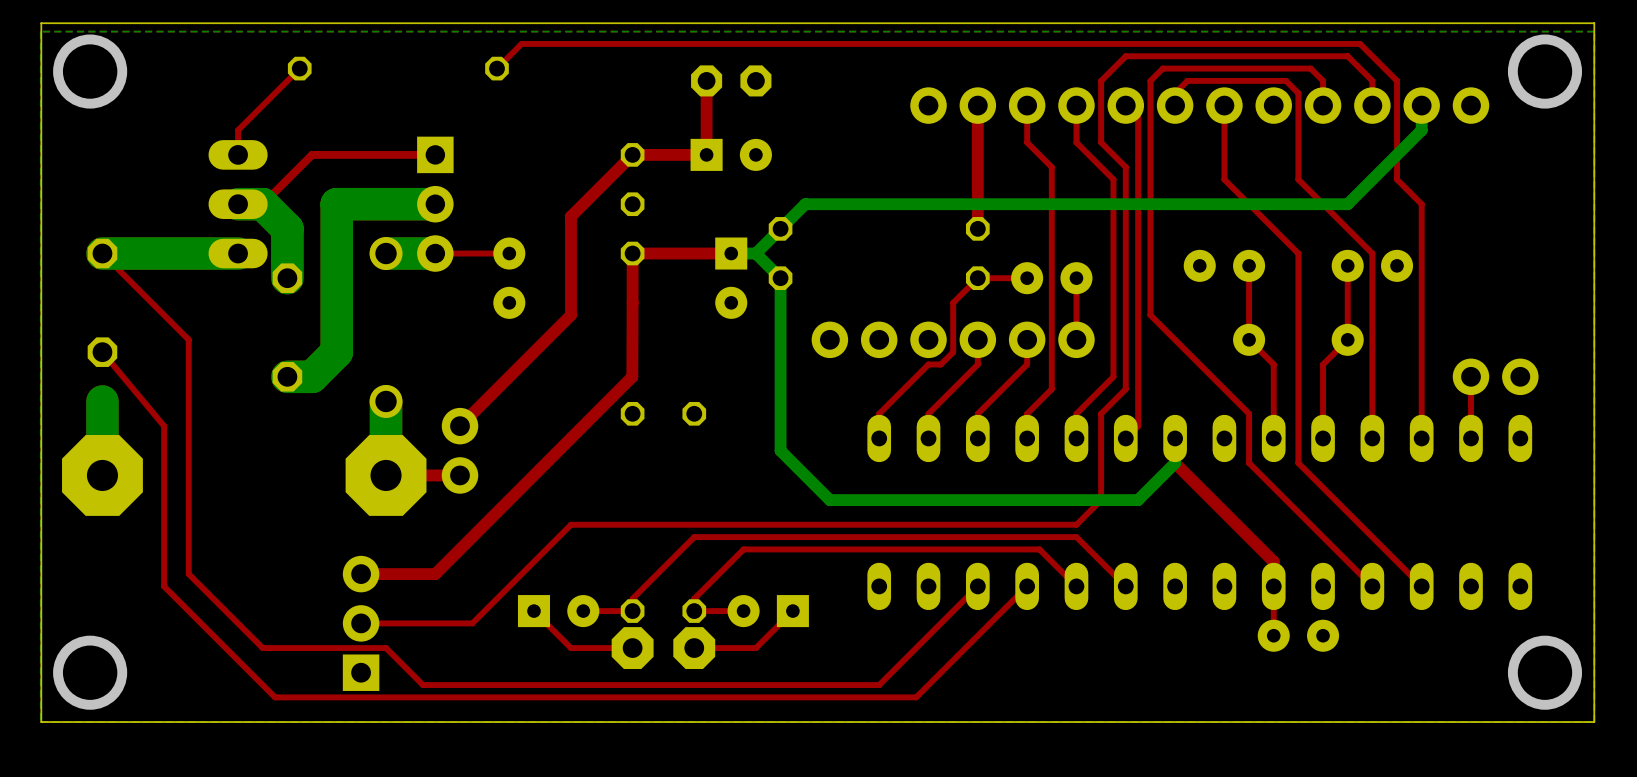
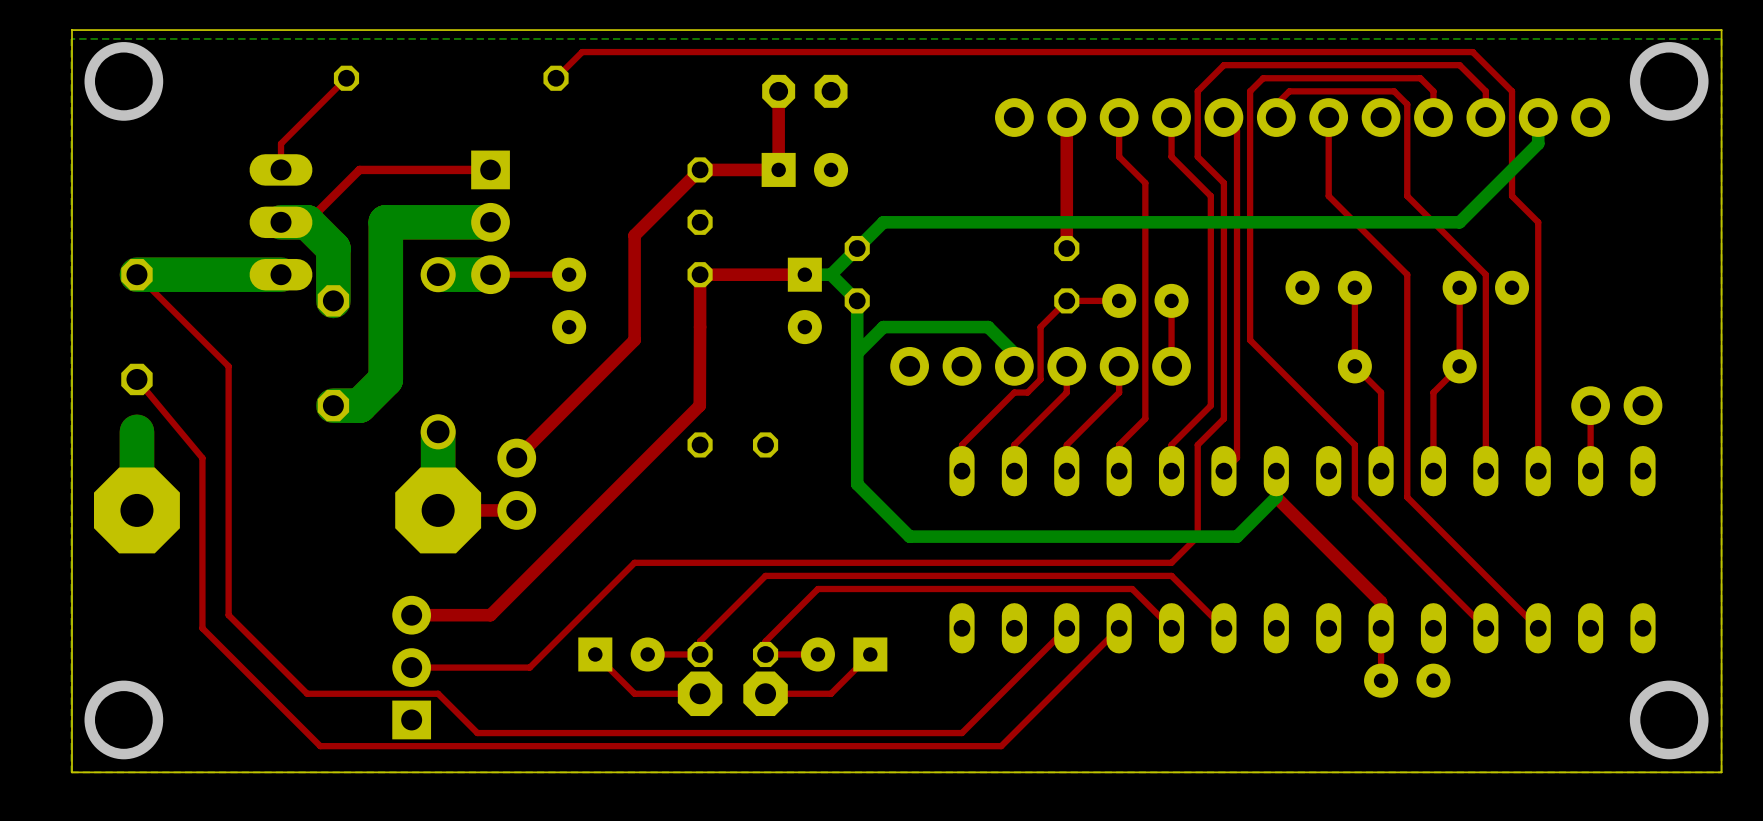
bottom track: none -> (857, 353) (883, 327) (988, 327) (1014, 353) (1014, 366)

